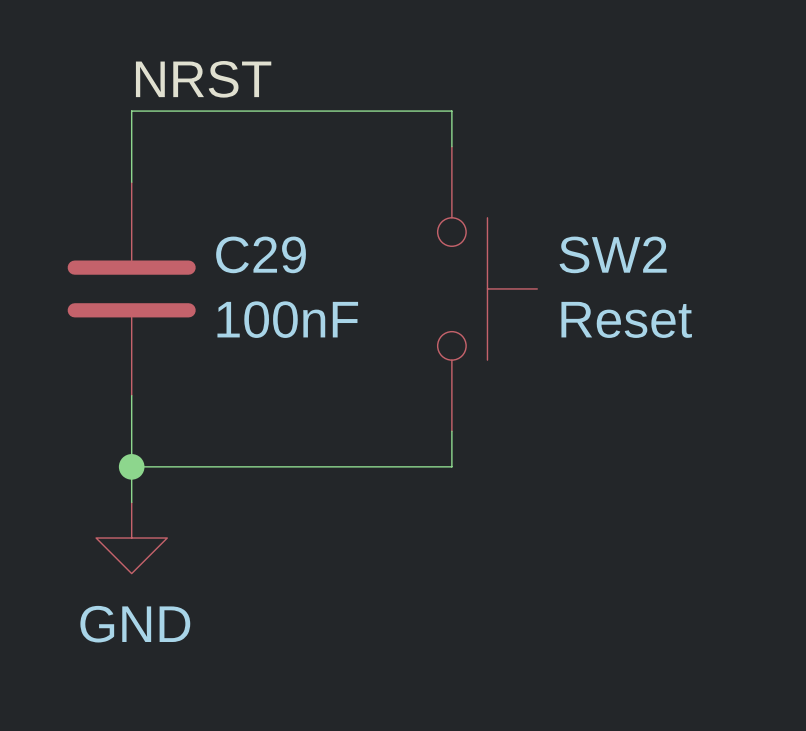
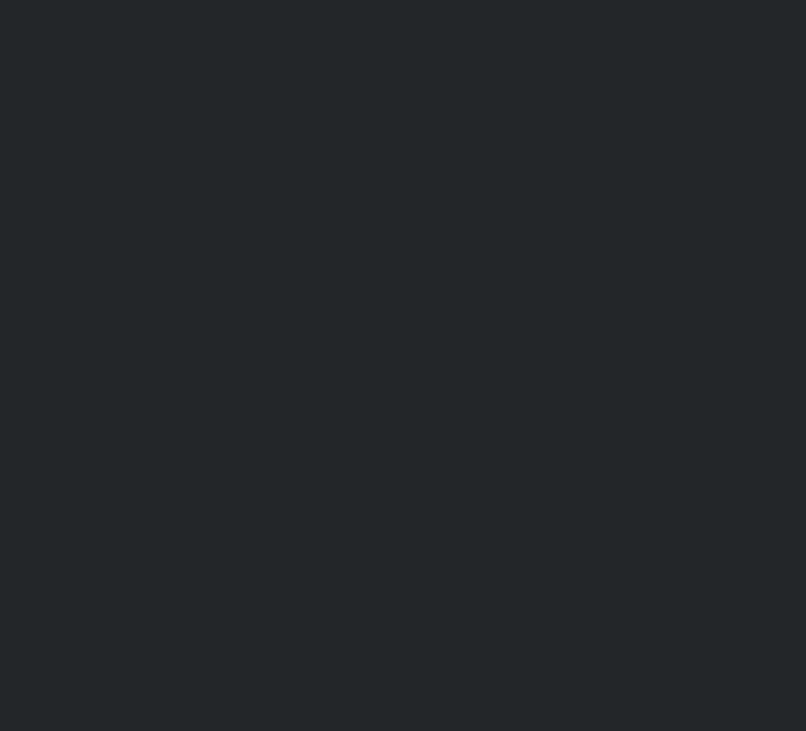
label: NRST (203, 79) -> none
wire: (451, 146) (451, 111) (131, 111) (131, 182) -> none
C29: 100nF (131, 288) -> none
SW2: Reset (487, 288) -> none
wire: (131, 395) (131, 502) -> none
wire: (451, 431) (451, 466) (131, 466) -> none
junction: (131, 466) -> none
power symbol: GND (131, 538) -> none

